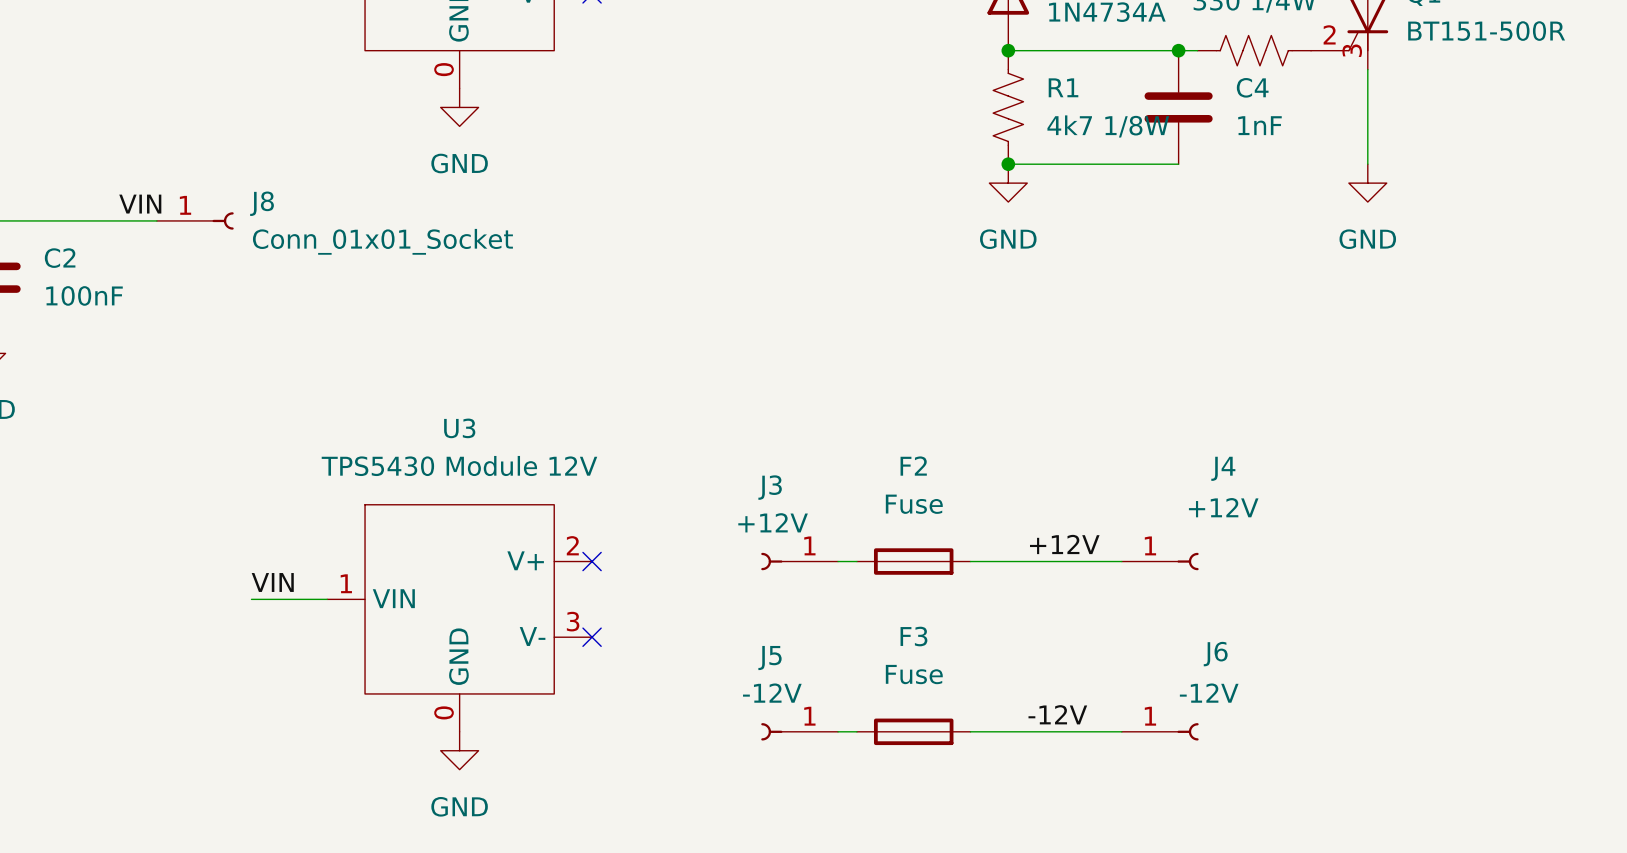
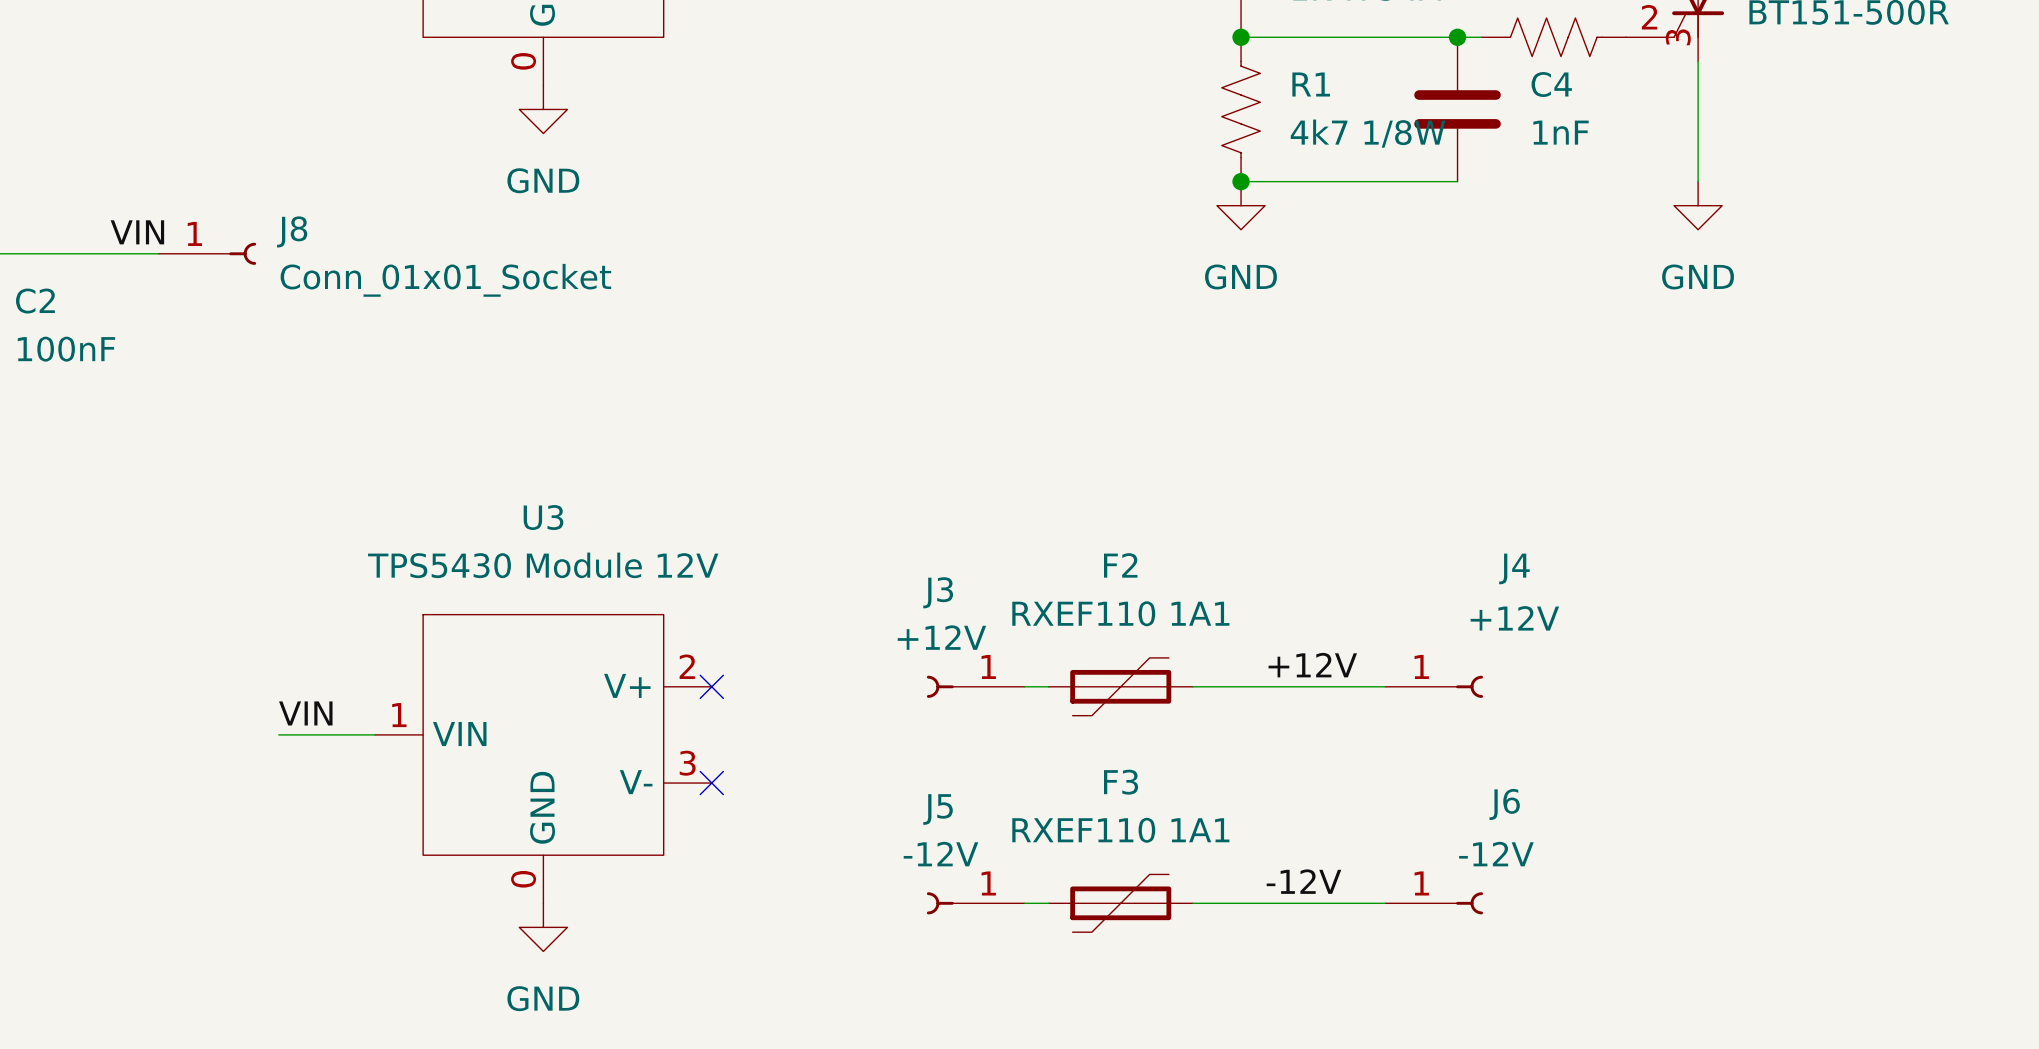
F2 value: Fuse (914, 504) -> RXEF110 1A1 (1120, 613)
F2 symbol: [856, 548, 971, 575] -> [1048, 657, 1193, 716]
F3 value: Fuse (914, 674) -> RXEF110 1A1 (1120, 830)
F3 symbol: [856, 718, 971, 746] -> [1048, 874, 1193, 933]

